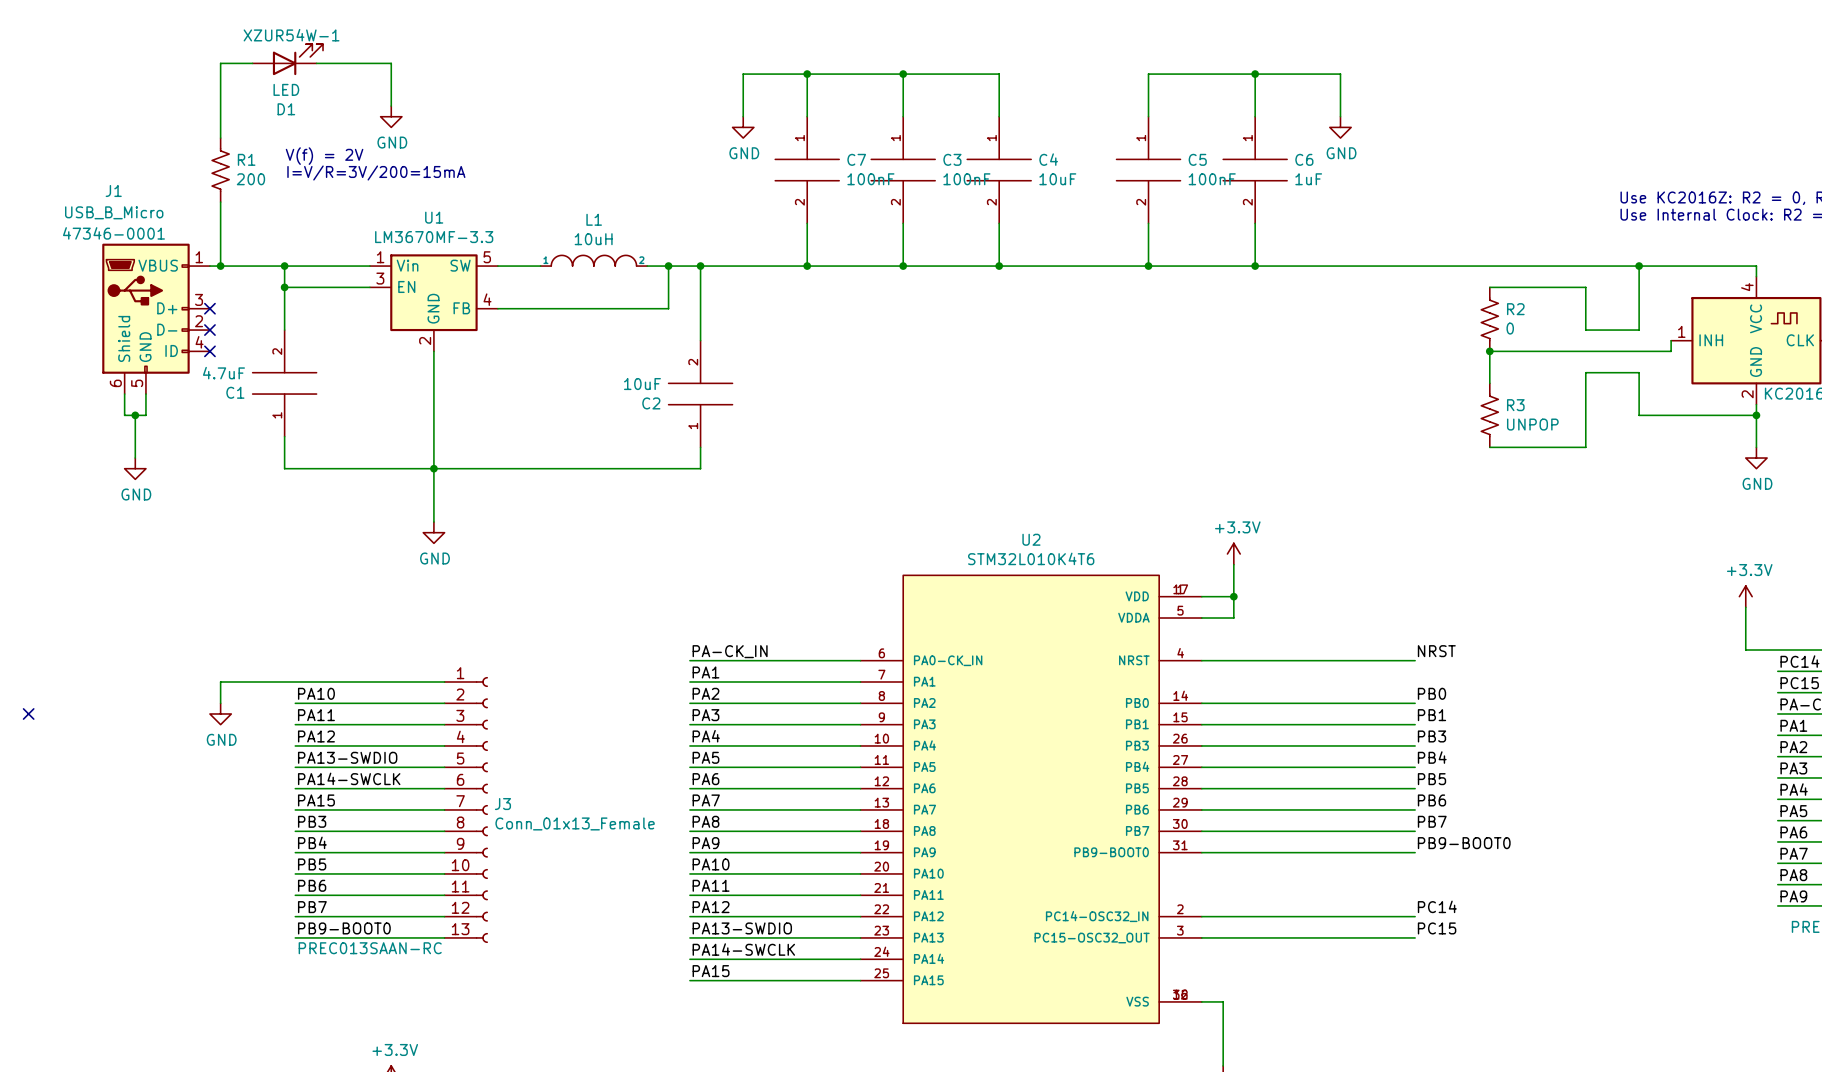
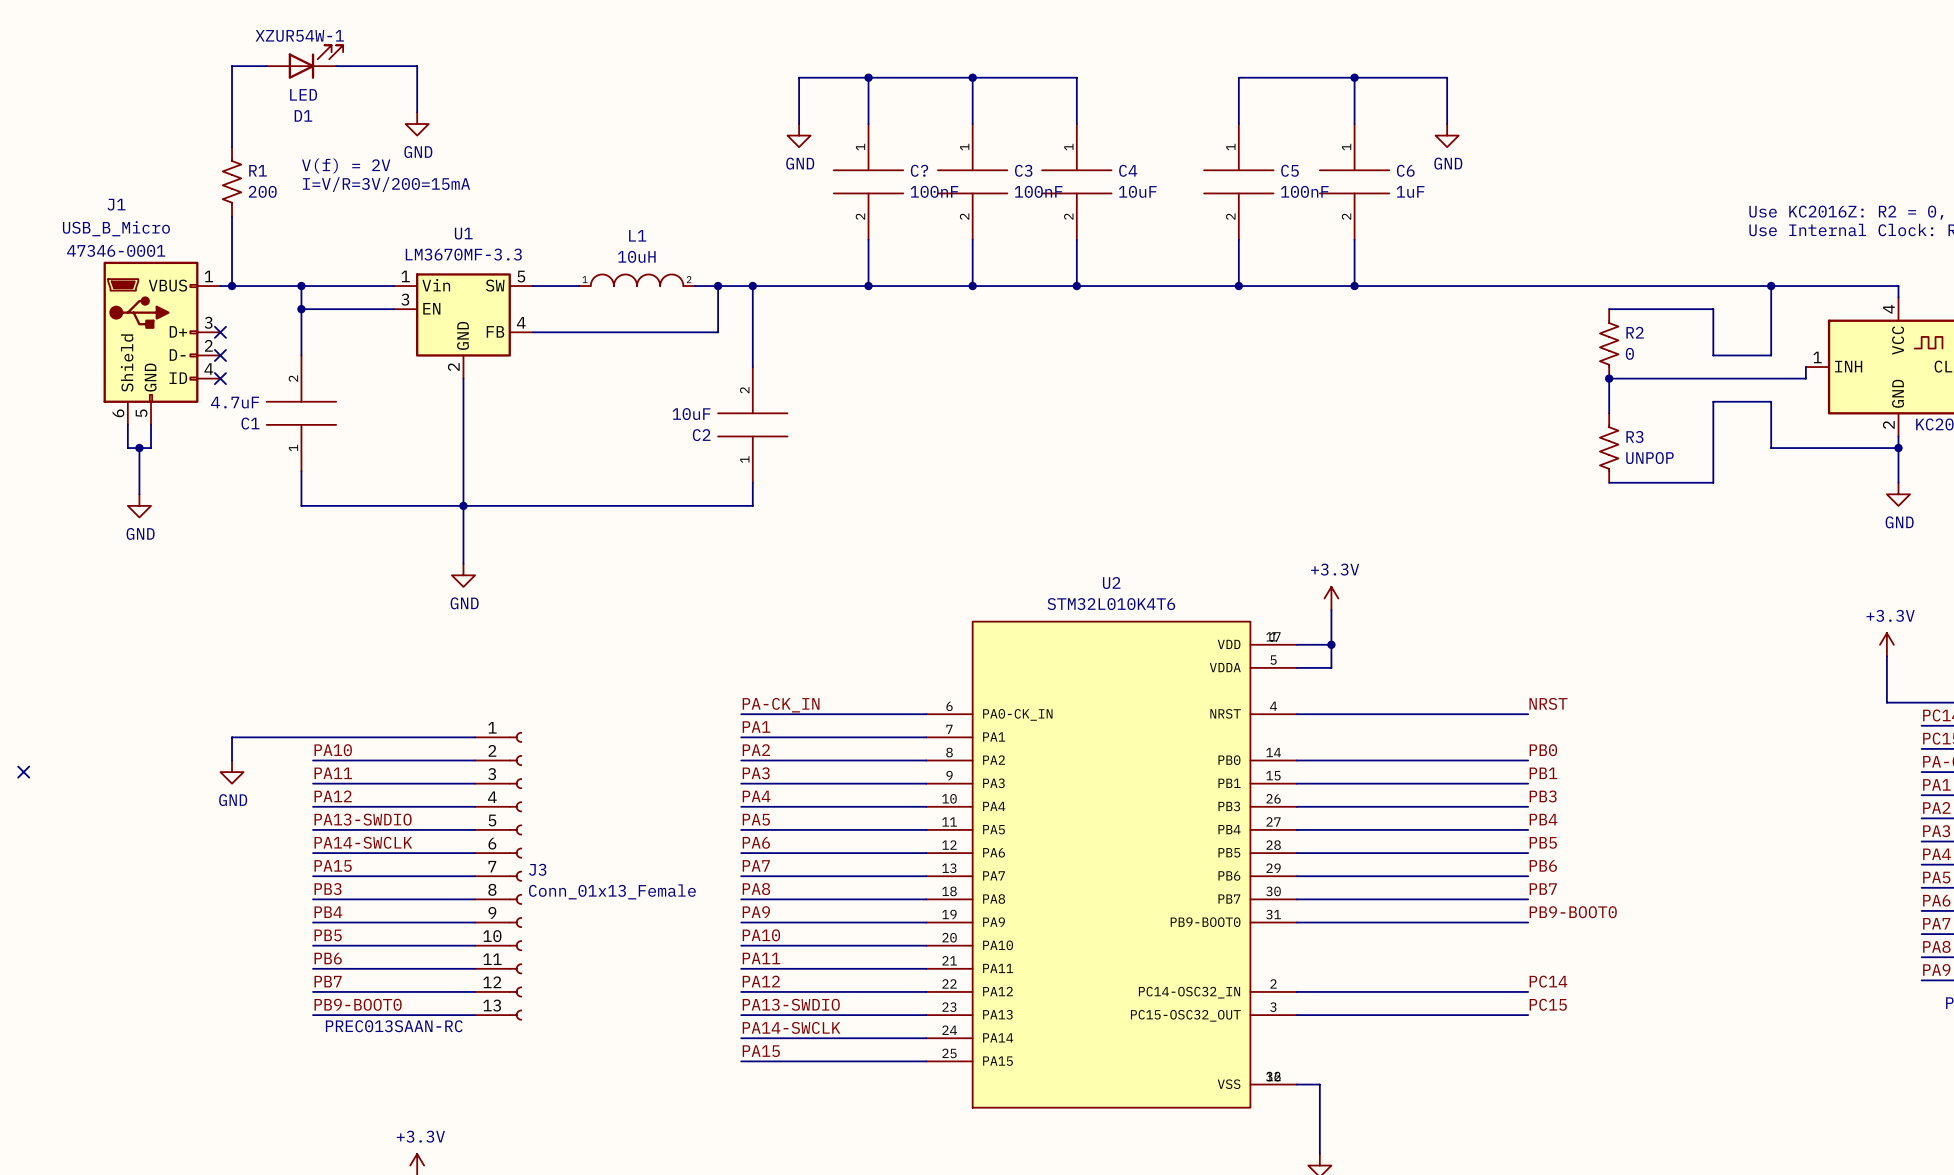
C7 name: C7 (856, 159) -> C? (919, 170)

